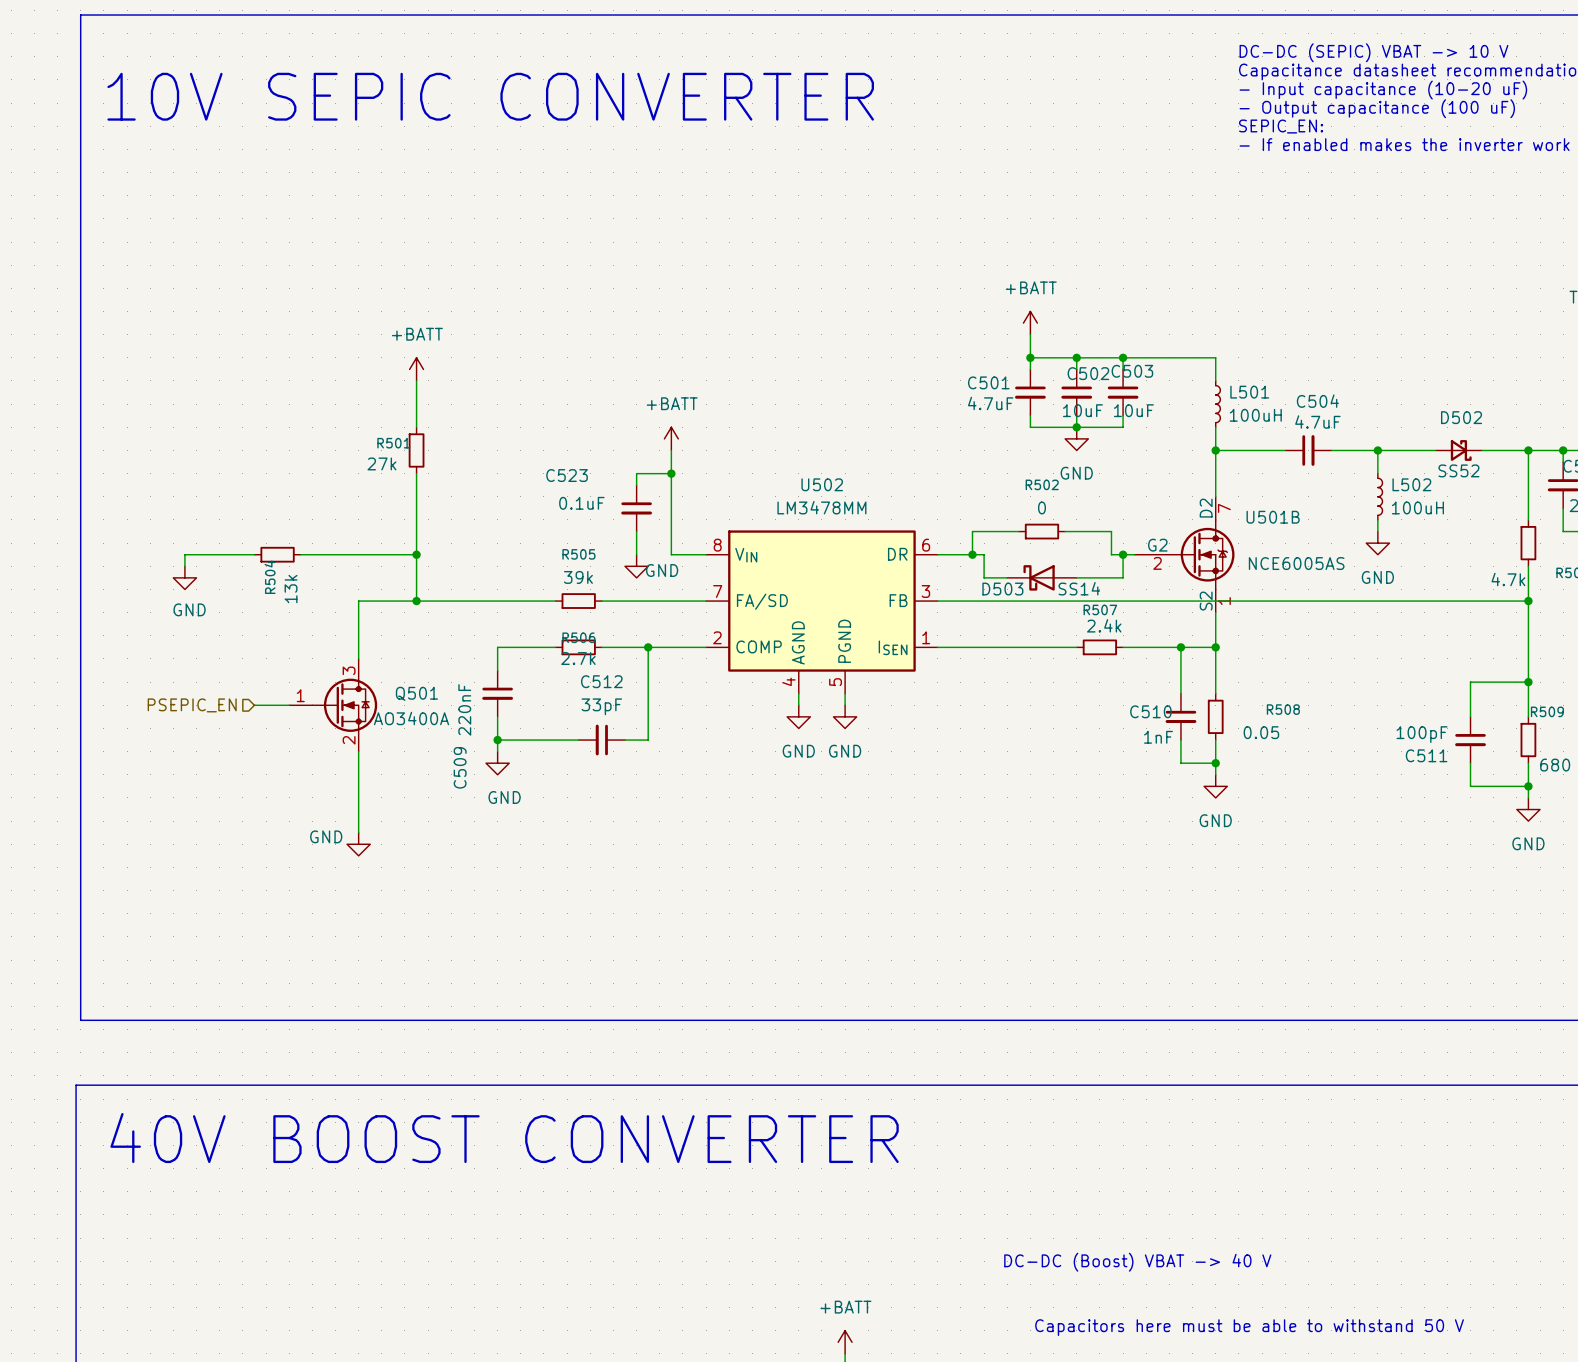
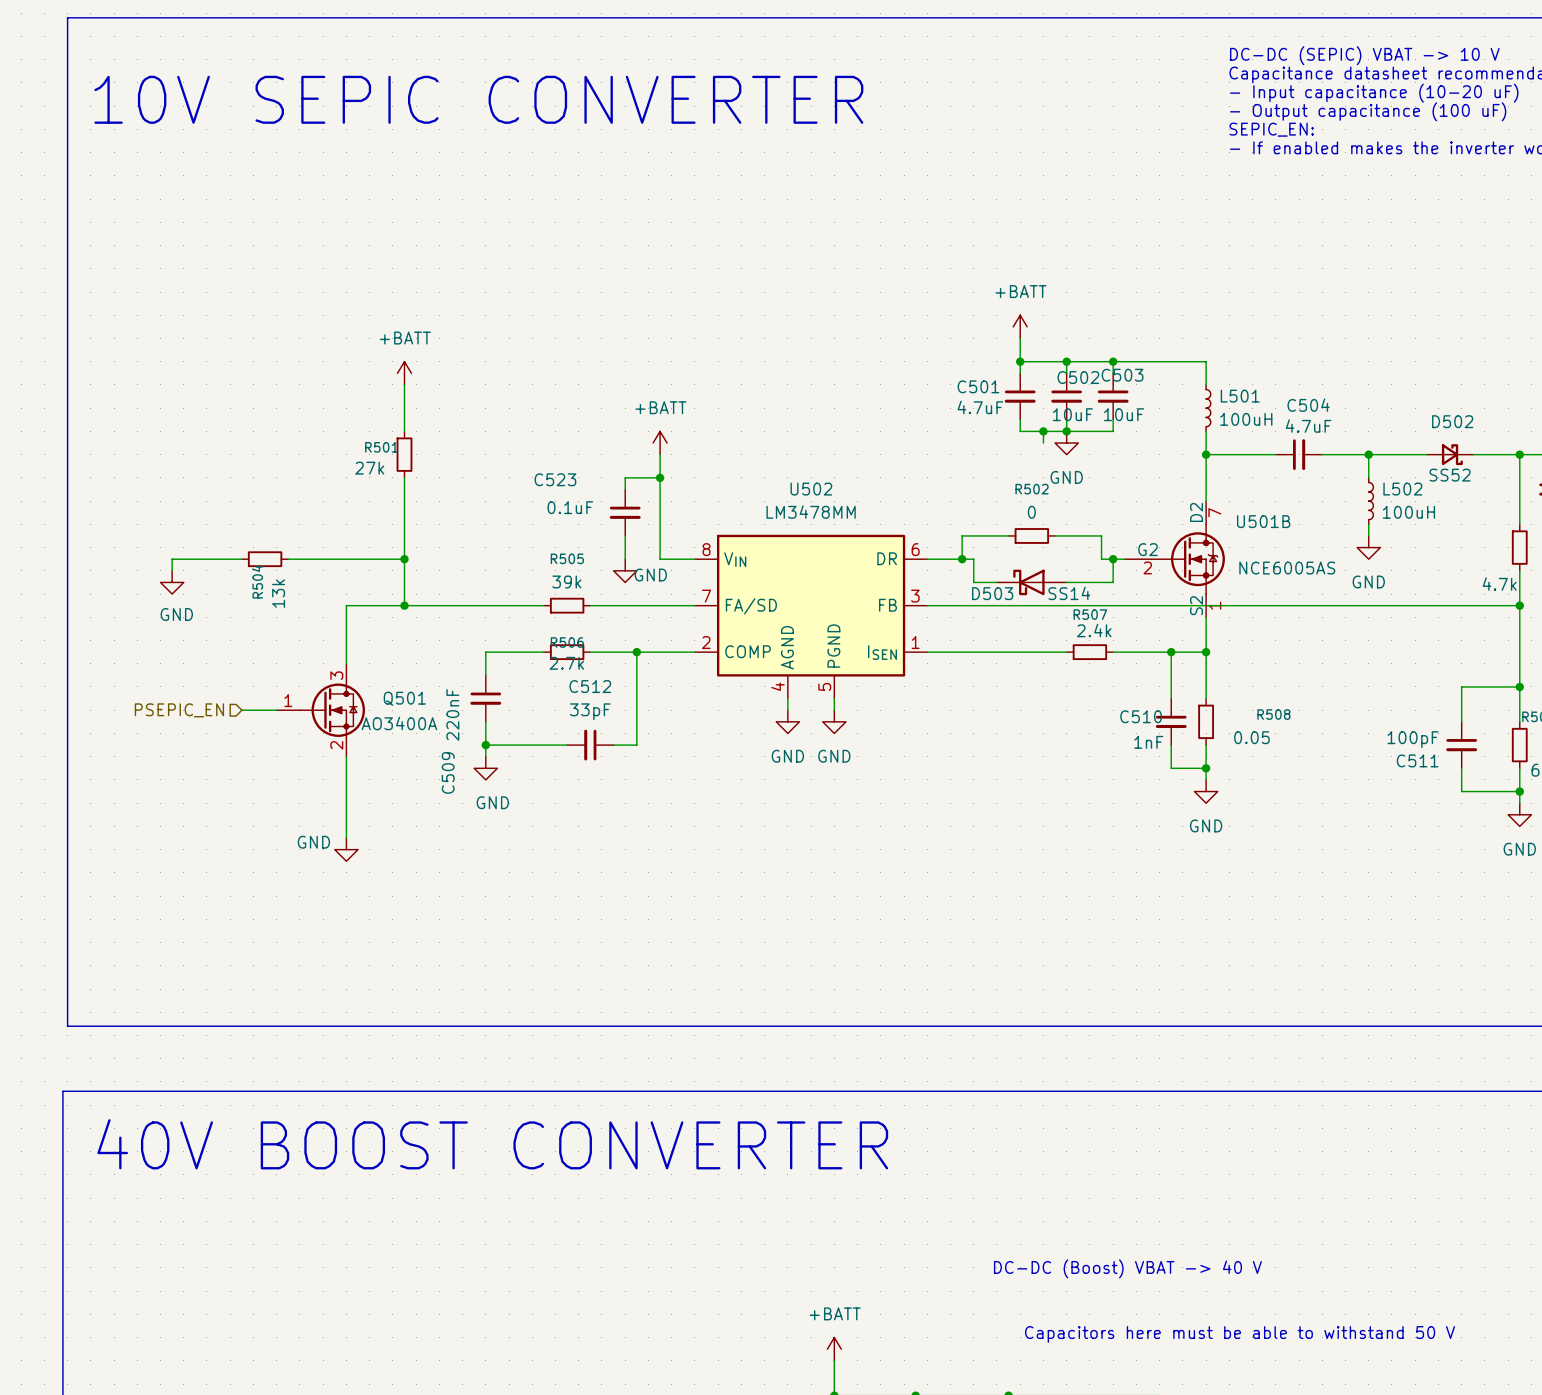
wire: none -> (1043, 431) (1043, 443)
junction: none -> (1043, 431)

